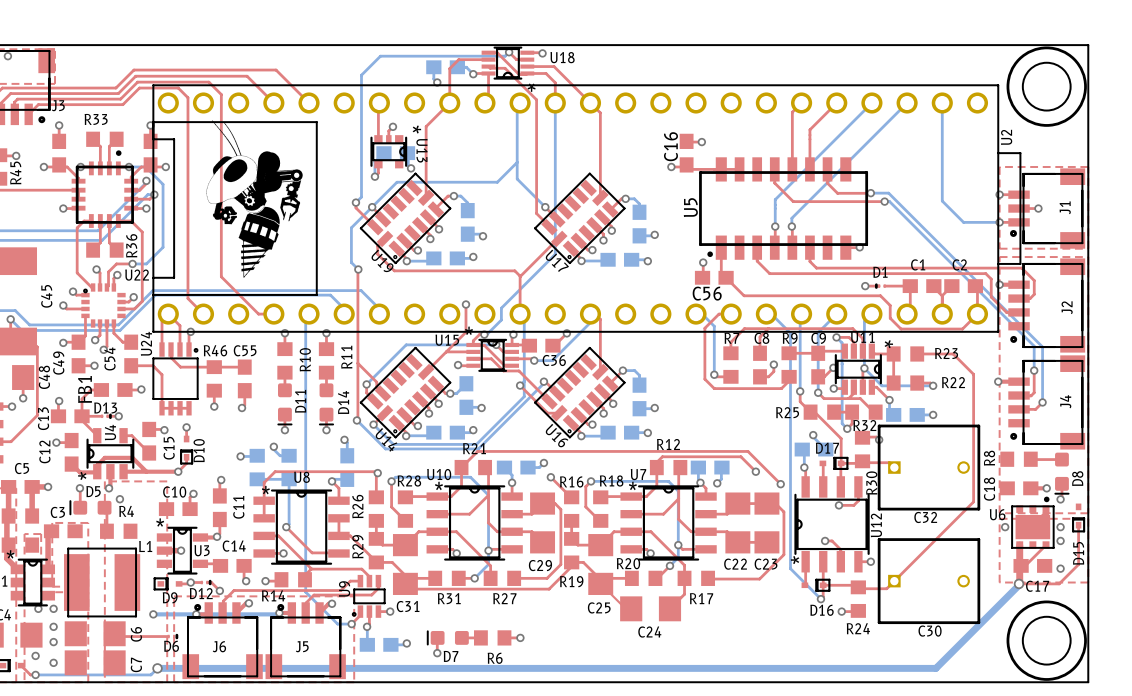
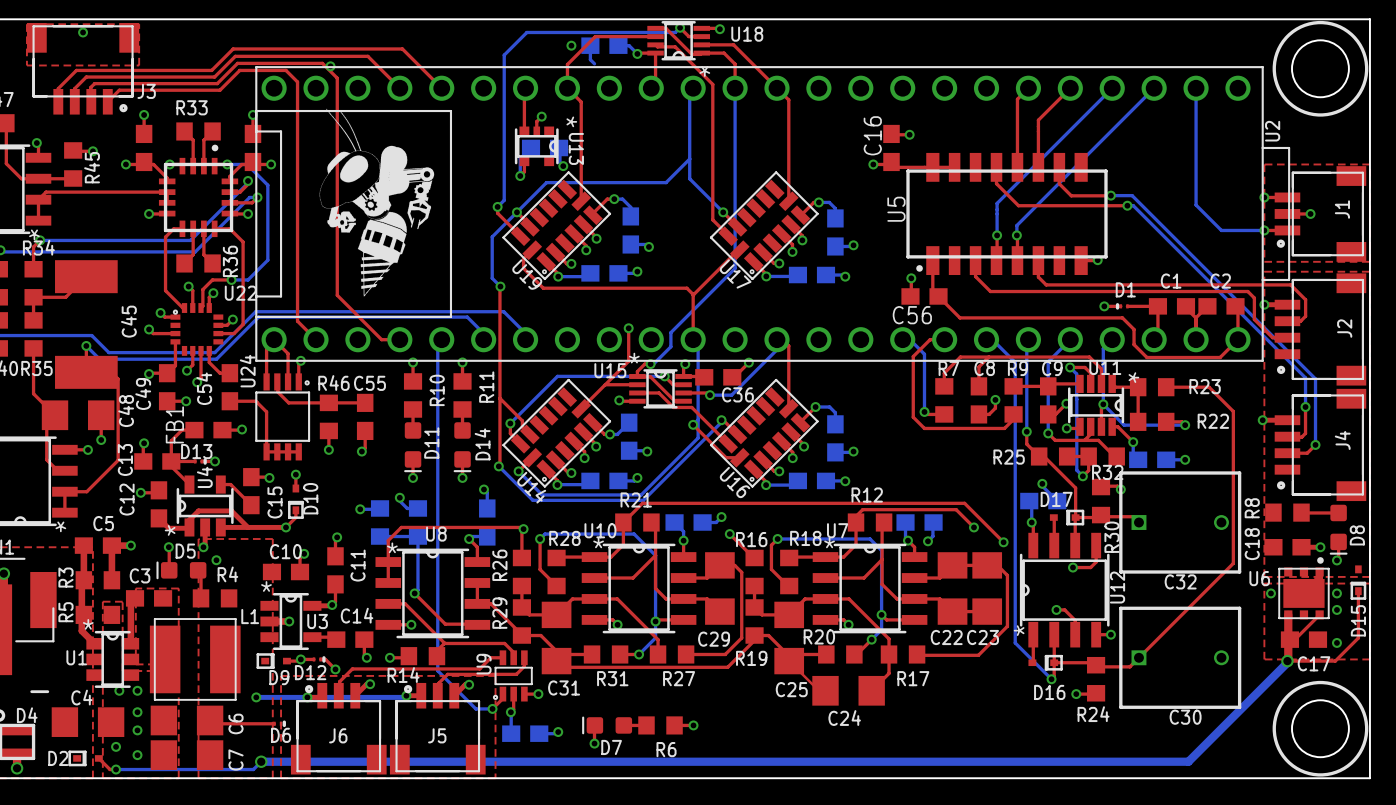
top track: (458, 59) (449, 68) (449, 103) (426, 126) -> (620, 36) (595, 36) (567, 64) (567, 88) (581, 102) (581, 116)
via position: (437, 82) -> (571, 45)
via: none -> (330, 66)

